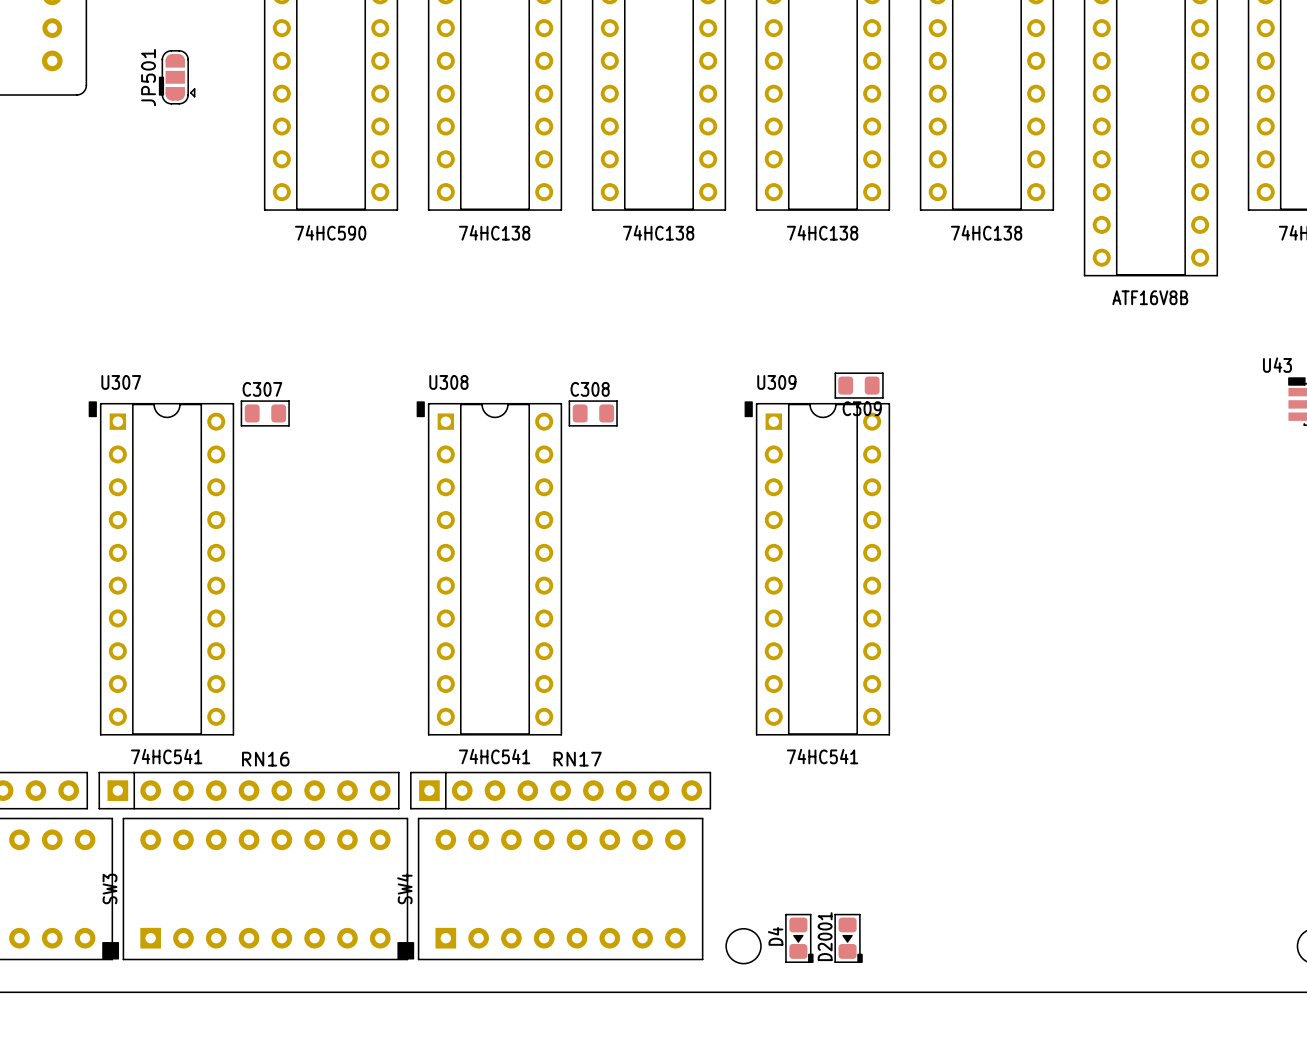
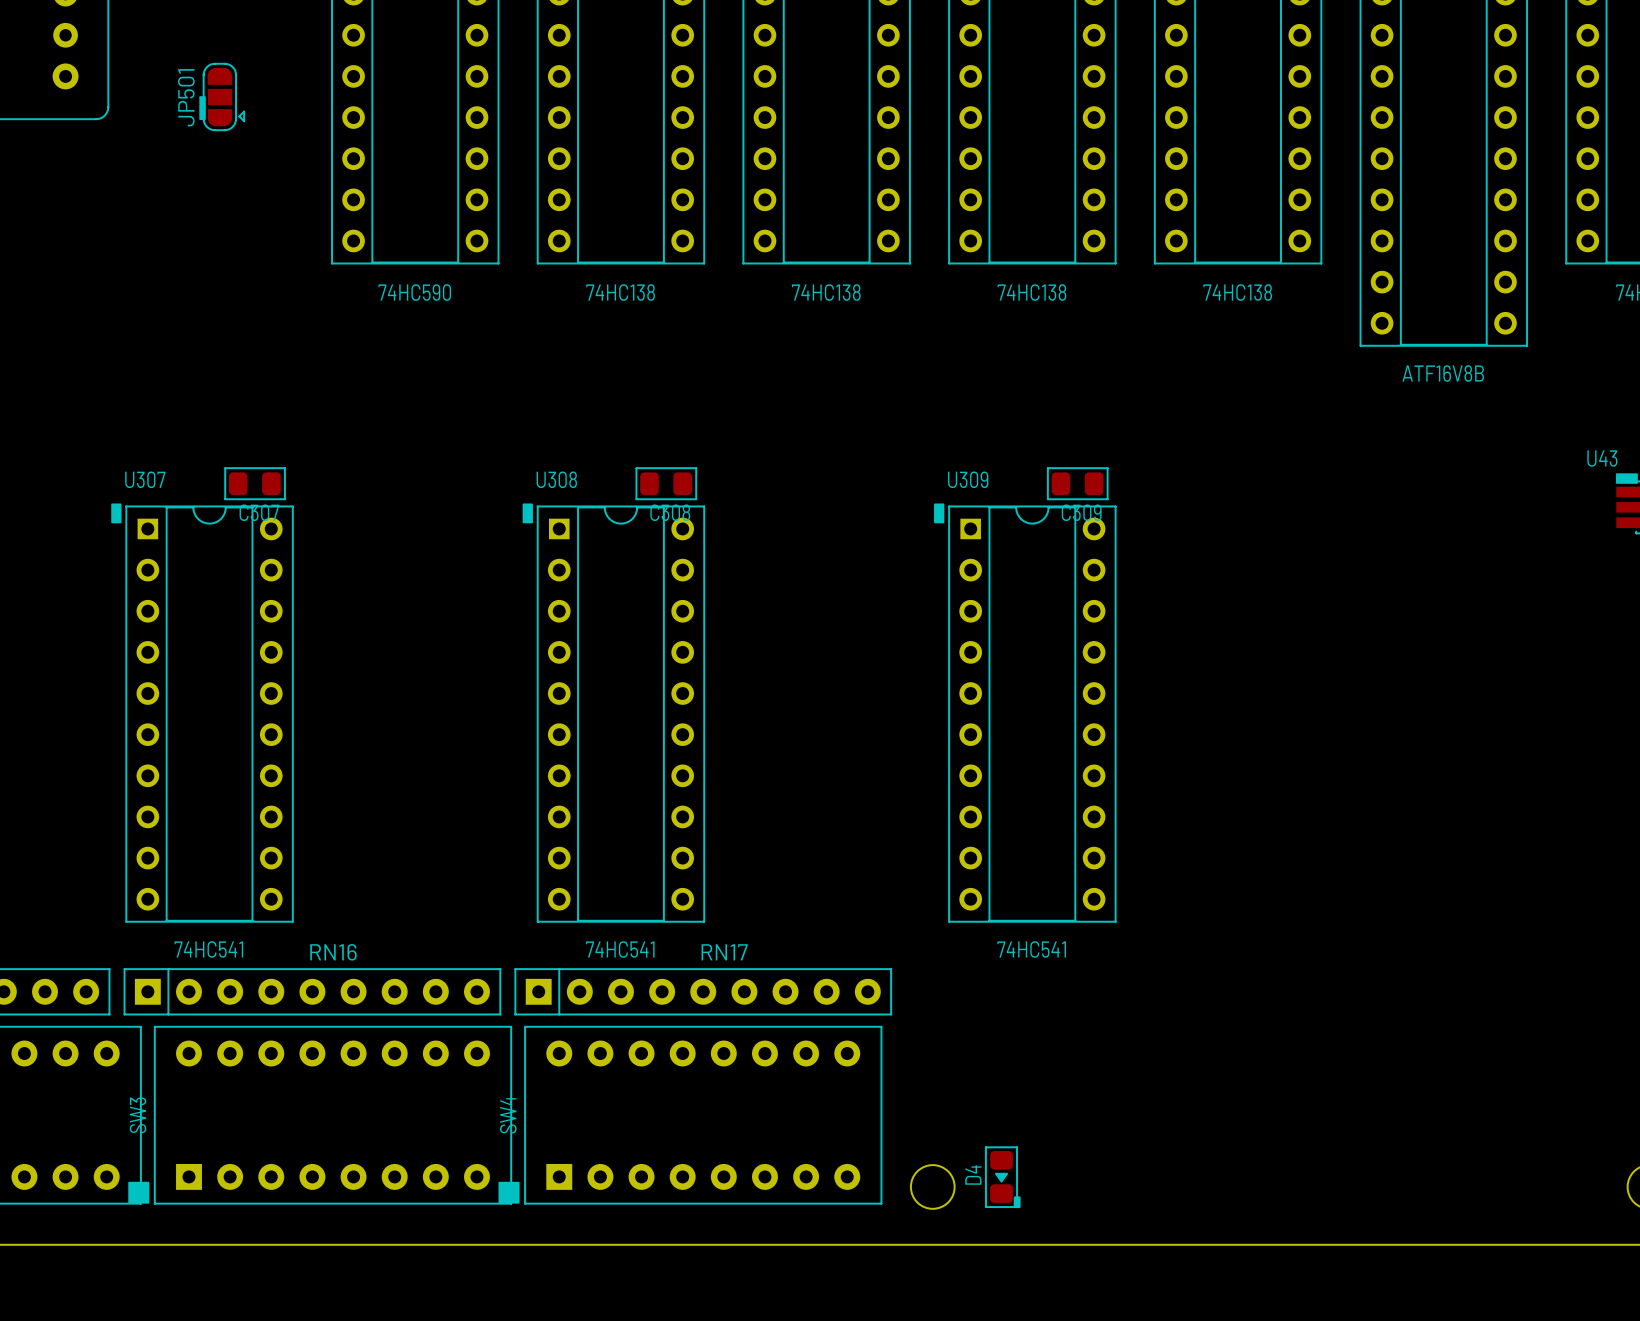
C307 rotation: 0° (265, 413) -> 180° (255, 483)
C307 position: (265, 413) -> (255, 483)
C308 rotation: 0° (593, 413) -> 180° (666, 483)
C308 position: (593, 413) -> (666, 483)
D2001: (848, 938) -> none

